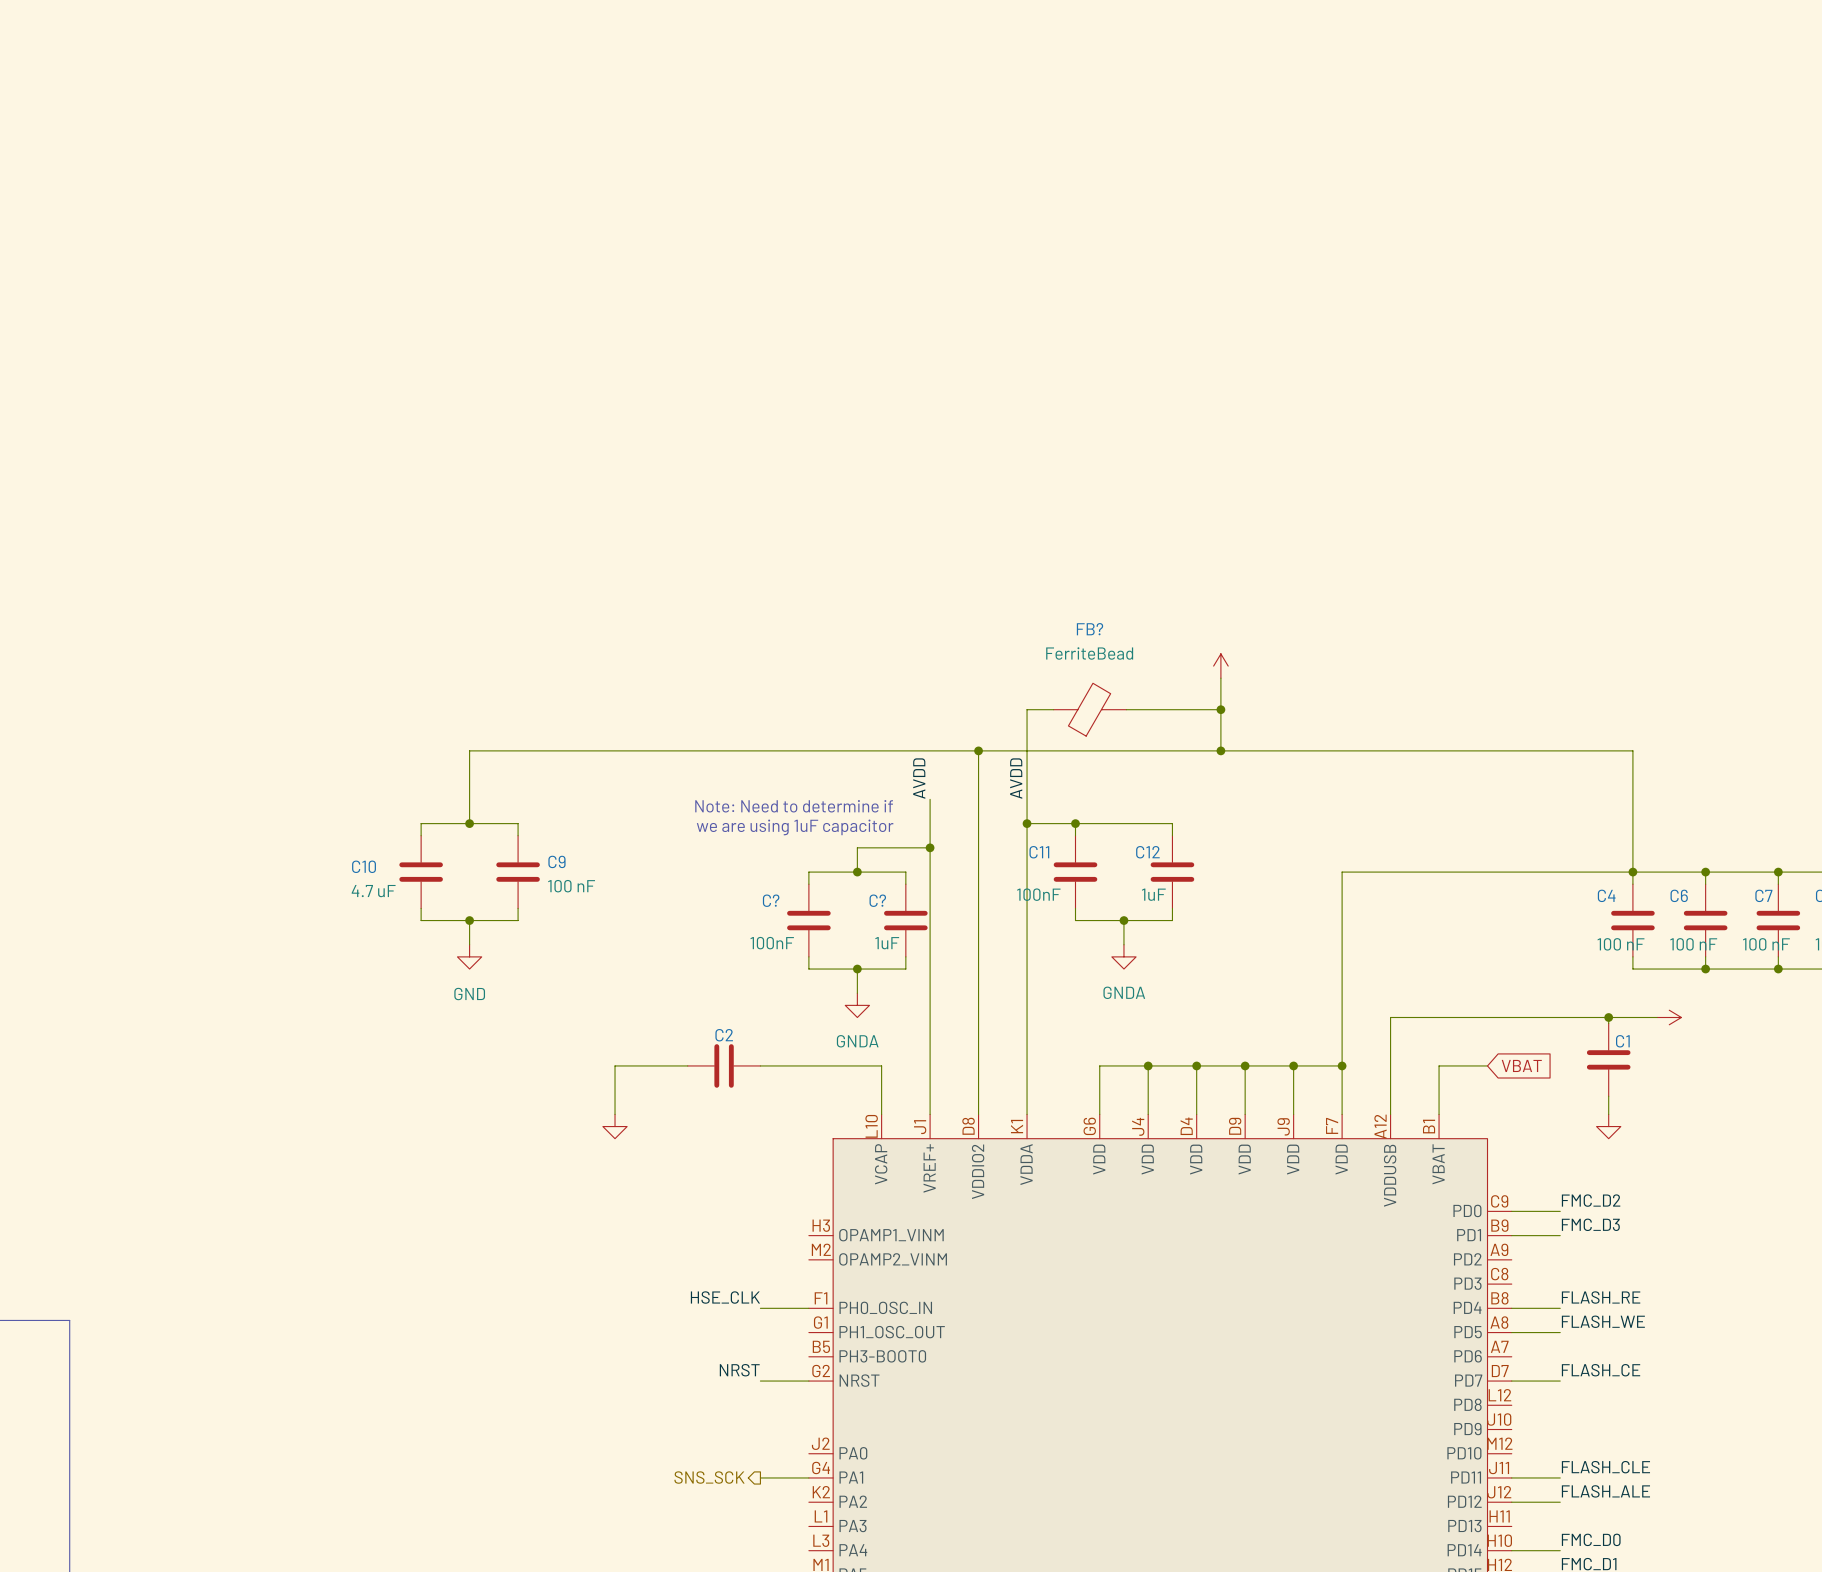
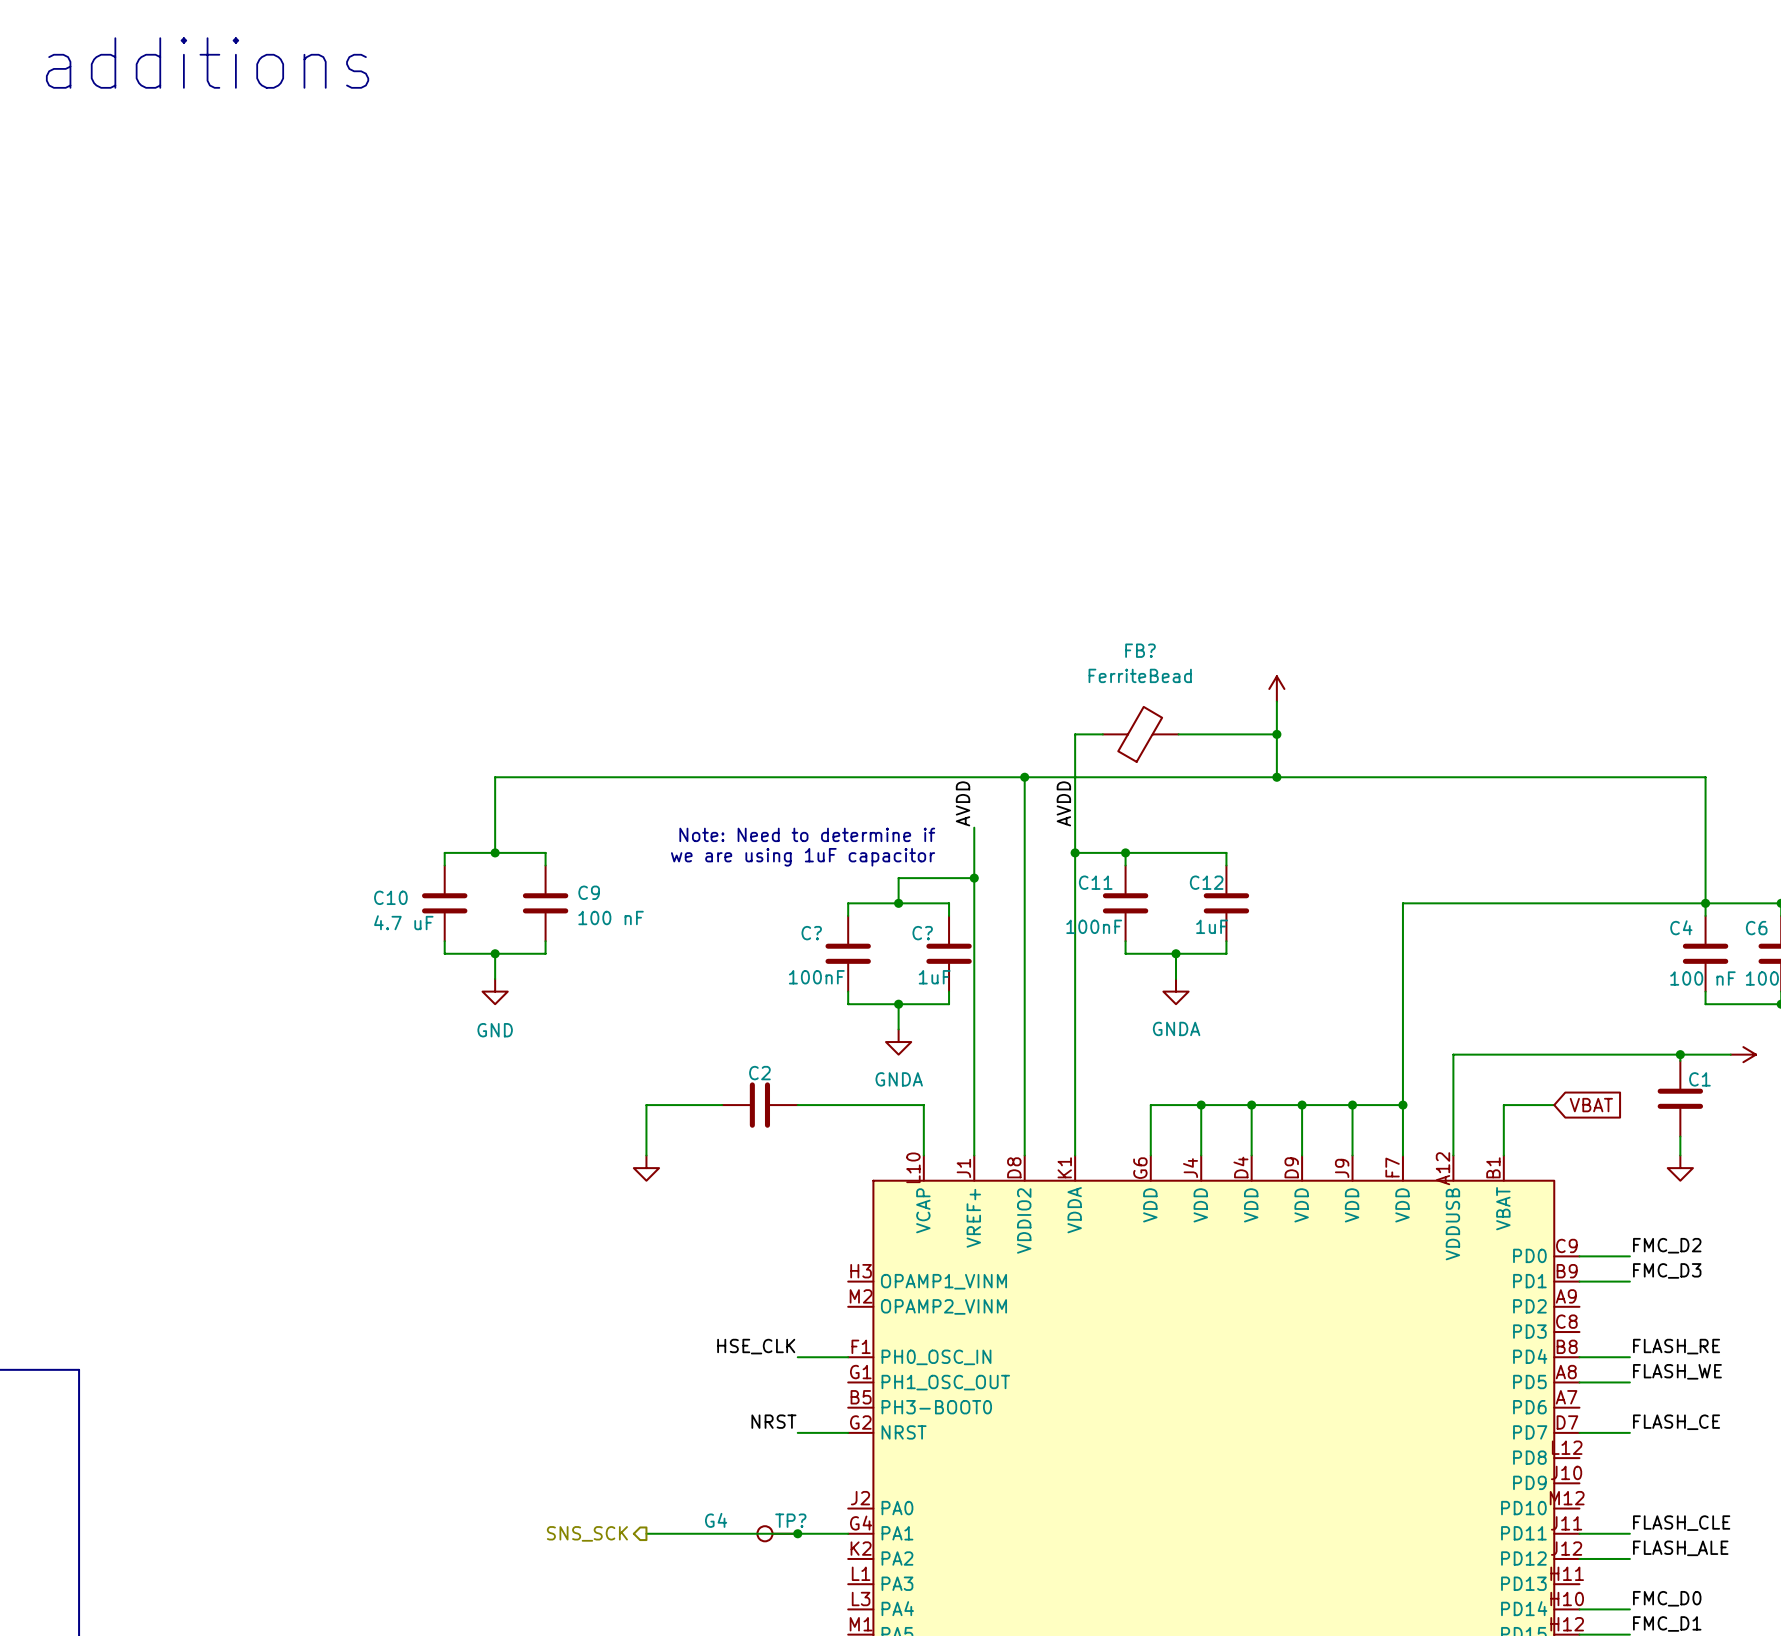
wire: none -> (646, 1533) (797, 1533)
hierarchical label position: SNS_SCK (709, 1477) -> SNS_SCK (587, 1533)
TP?: none -> G4 (777, 1533)
junction: none -> (797, 1533)

